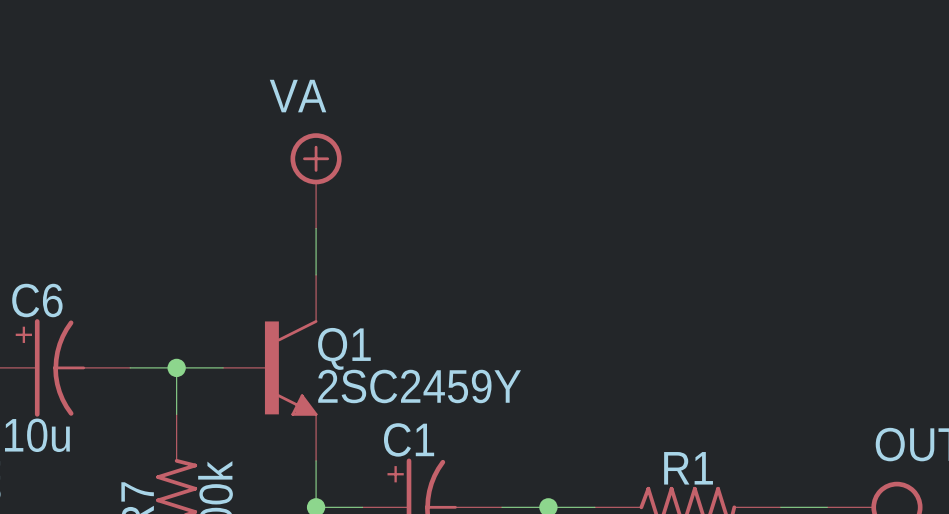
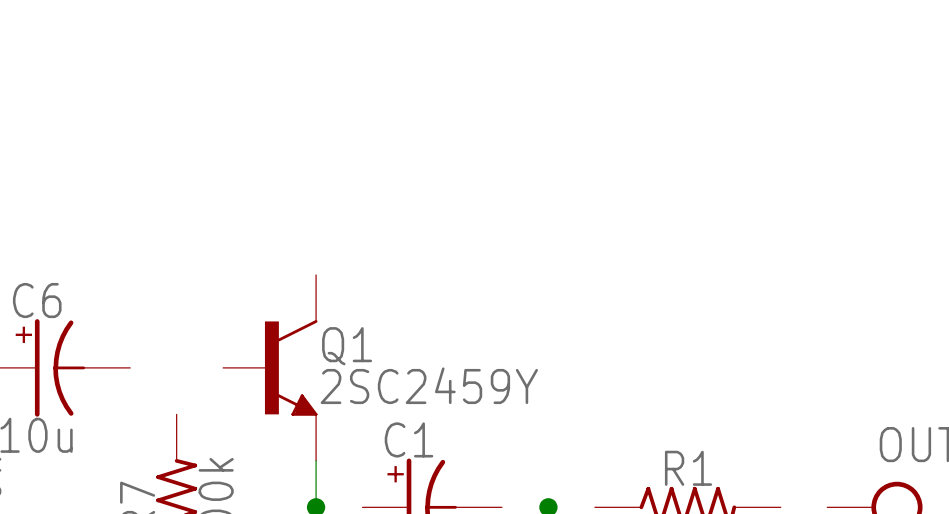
power symbol: VA (316, 180) -> none
wire: (316, 228) (316, 274) -> none
wire: (130, 367) (223, 367) -> none
wire: (176, 367) (176, 414) -> none
junction: (176, 367) -> none
wire: (316, 507) (362, 507) -> none
wire: (501, 507) (594, 507) -> none
wire: (780, 507) (827, 507) -> none

